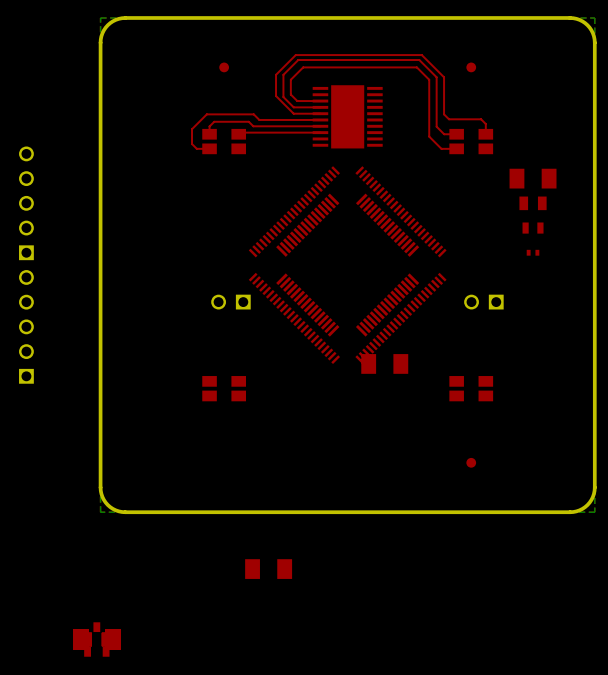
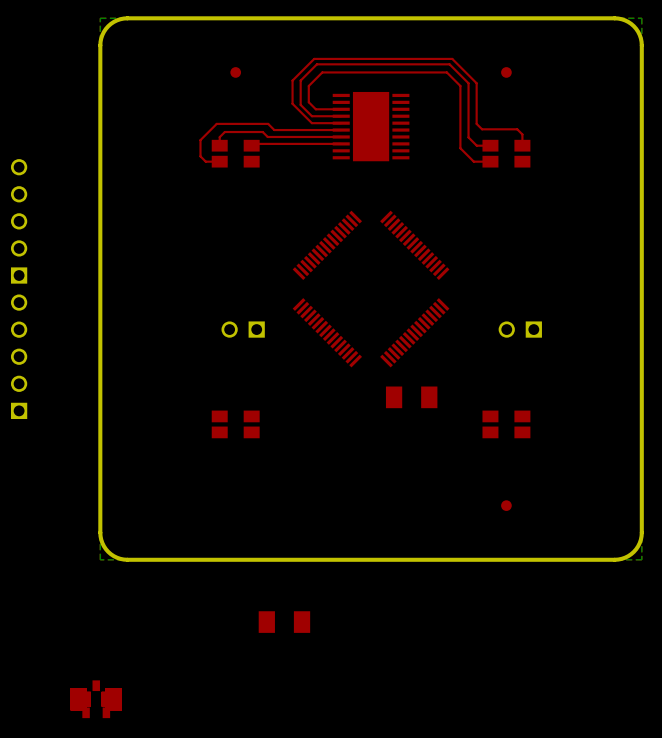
part: (533, 178) -> none
part: (533, 203) -> none
part: (533, 228) -> none
part: (533, 252) -> none
part: (347, 265) -> none

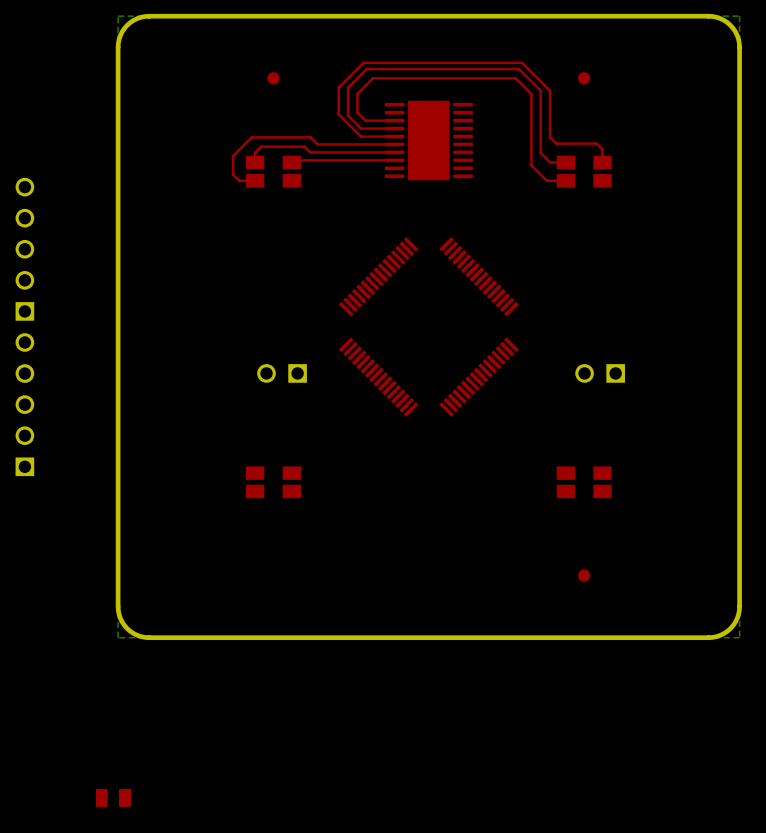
part: (411, 397) -> none
part: (284, 622) -> none
part: (96, 699) -> none
part: (96, 699) -> none

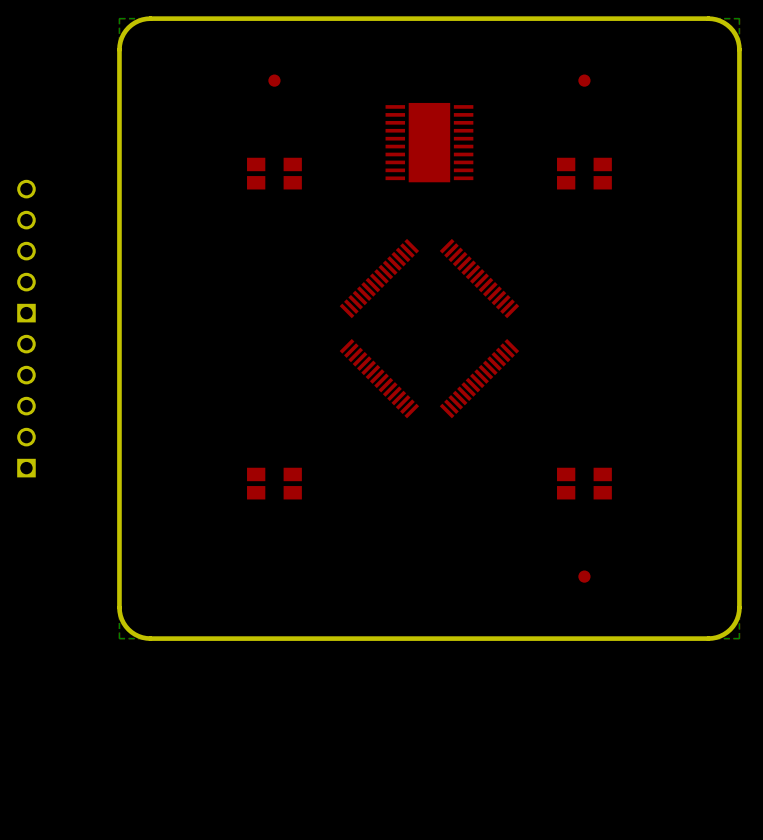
top track: (394, 120) (365, 120) (357, 112) (357, 93) (372, 78) (515, 78) (531, 93) (531, 165) (546, 180) (565, 180) -> none
top track: (394, 128) (361, 128) (348, 115) (348, 87) (366, 69) (518, 69) (540, 90) (540, 152) (550, 162) (565, 162) -> none
top track: (394, 136) (360, 136) (338, 114) (338, 87) (363, 62) (522, 62) (550, 90) (550, 137) (556, 143) (596, 143) (602, 149) (602, 162) -> none
top track: (394, 144) (317, 144) (310, 137) (251, 137) (233, 156) (233, 174) (239, 180) (255, 180) -> none
top track: (394, 152) (310, 152) (304, 146) (261, 146) (255, 152) (255, 162) -> none
top track: (394, 160) (293, 160) (291, 162) -> none
part: (282, 373) -> none
part: (600, 373) -> none
part: (113, 797) -> none

